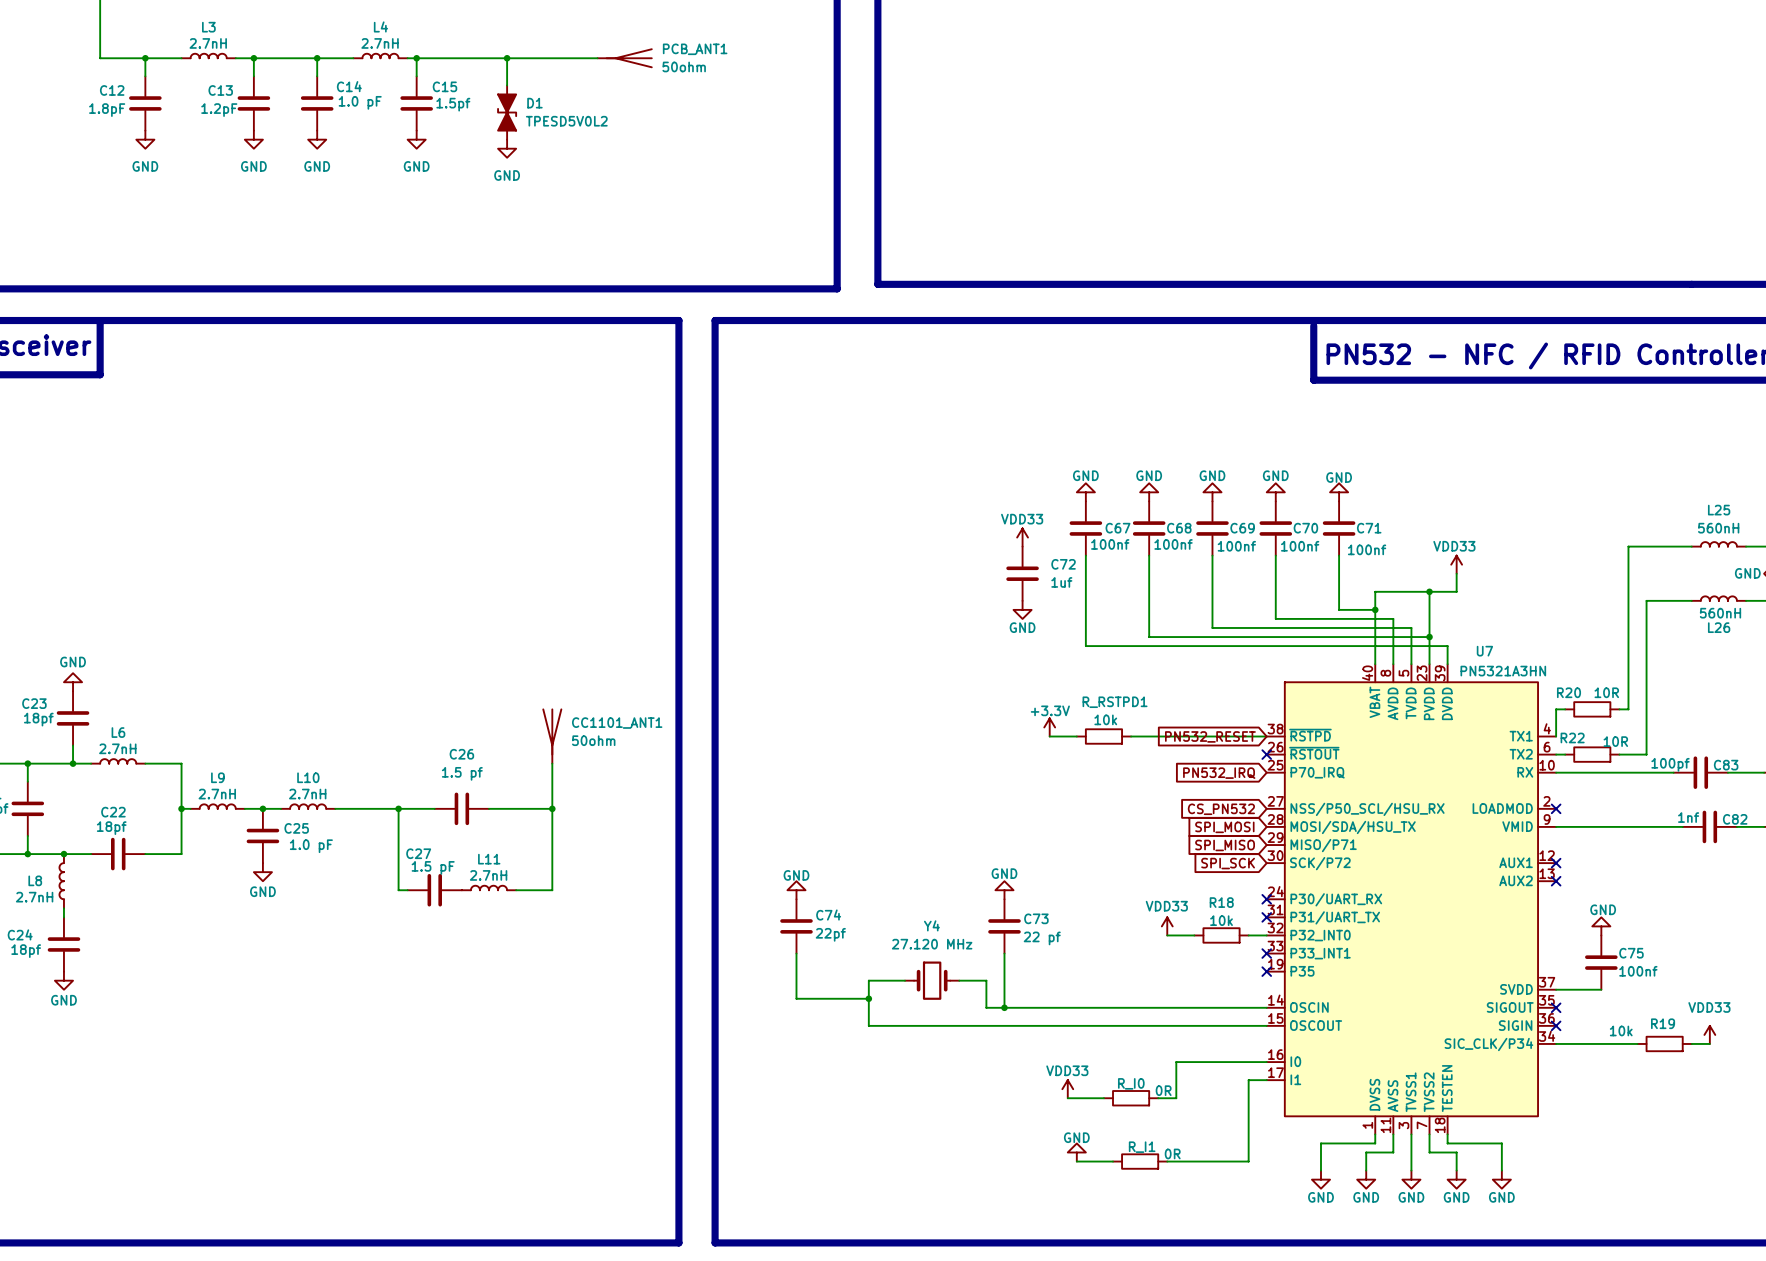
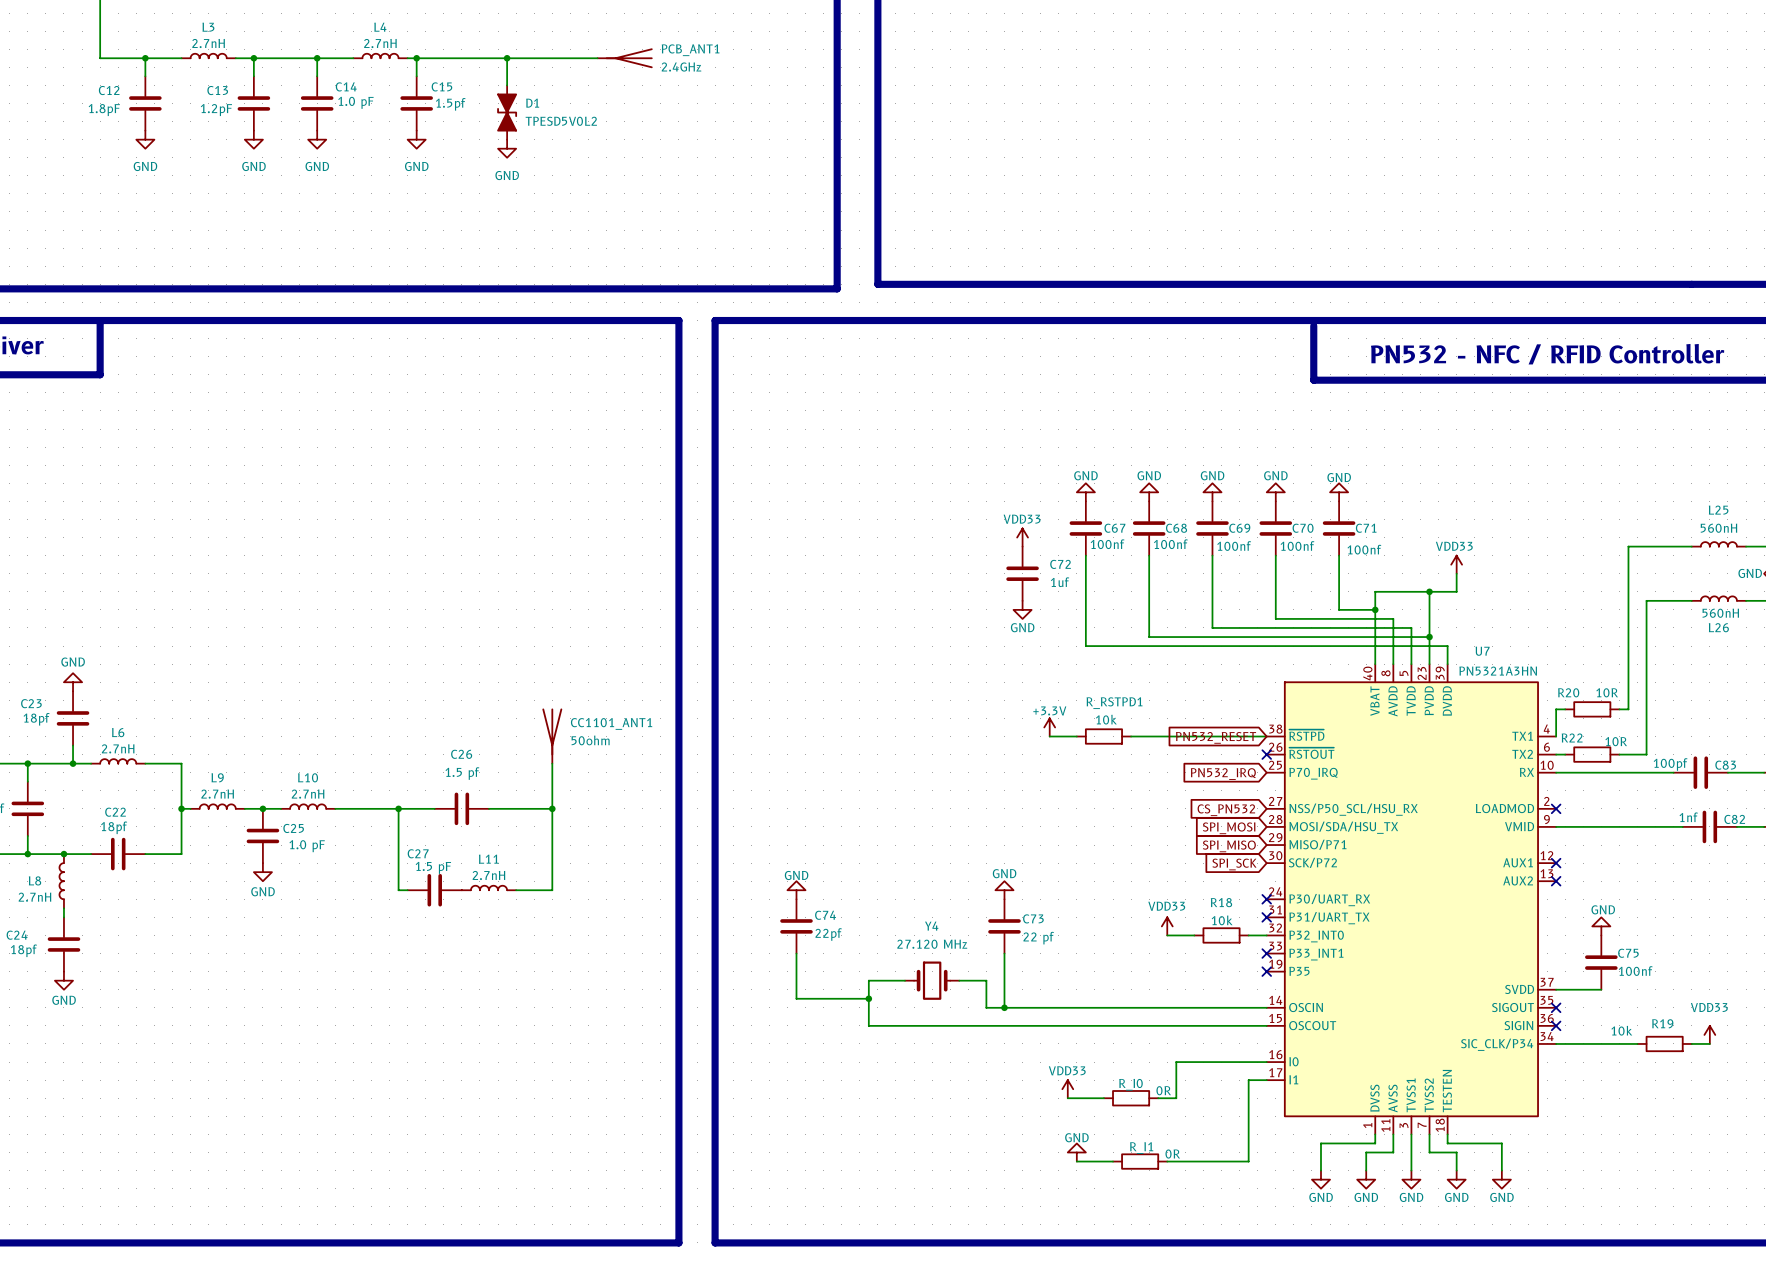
PCB_ANT1 value: 50ohm (684, 66) -> 2.4GHz (681, 67)

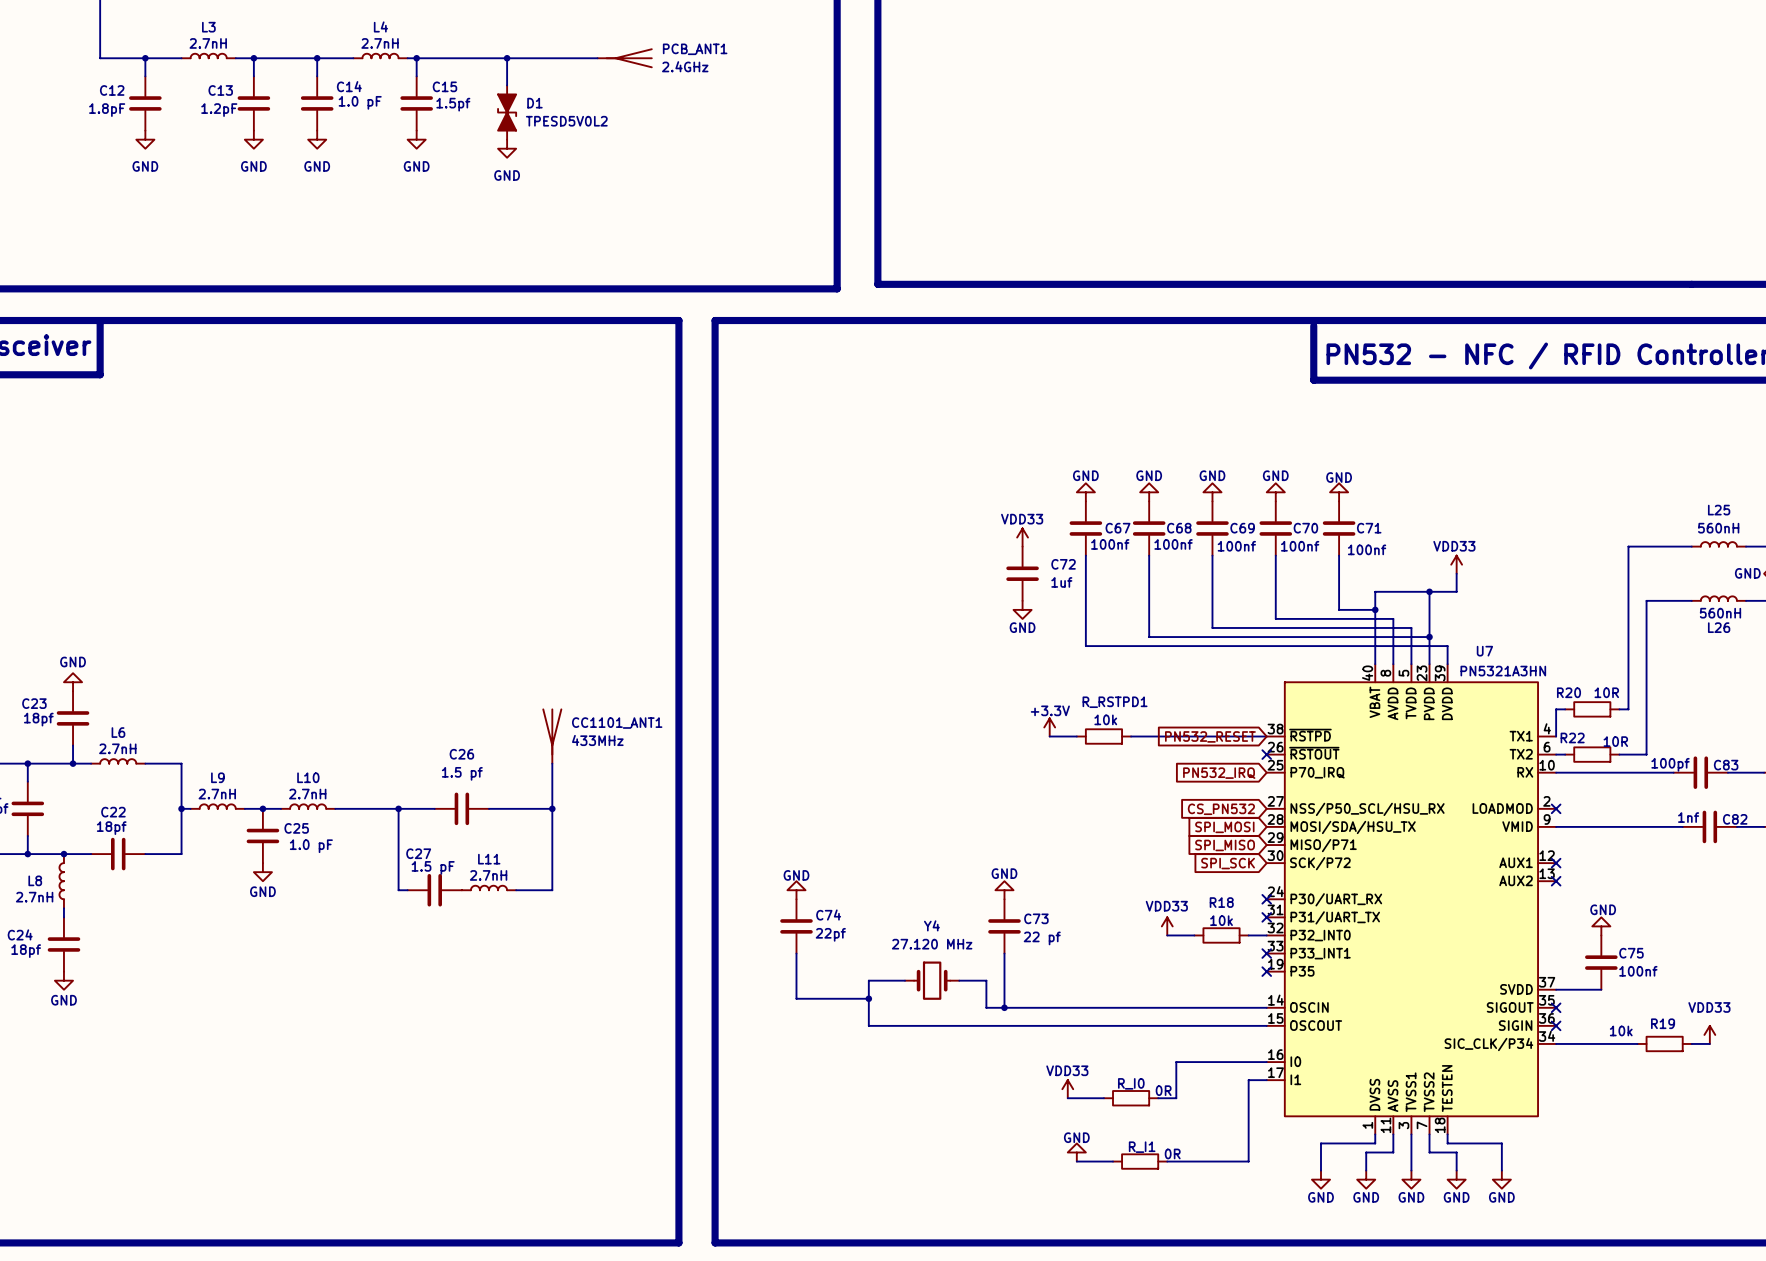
CC1101_ANT1 value: 50ohm (590, 740) -> 433MHz (597, 740)

